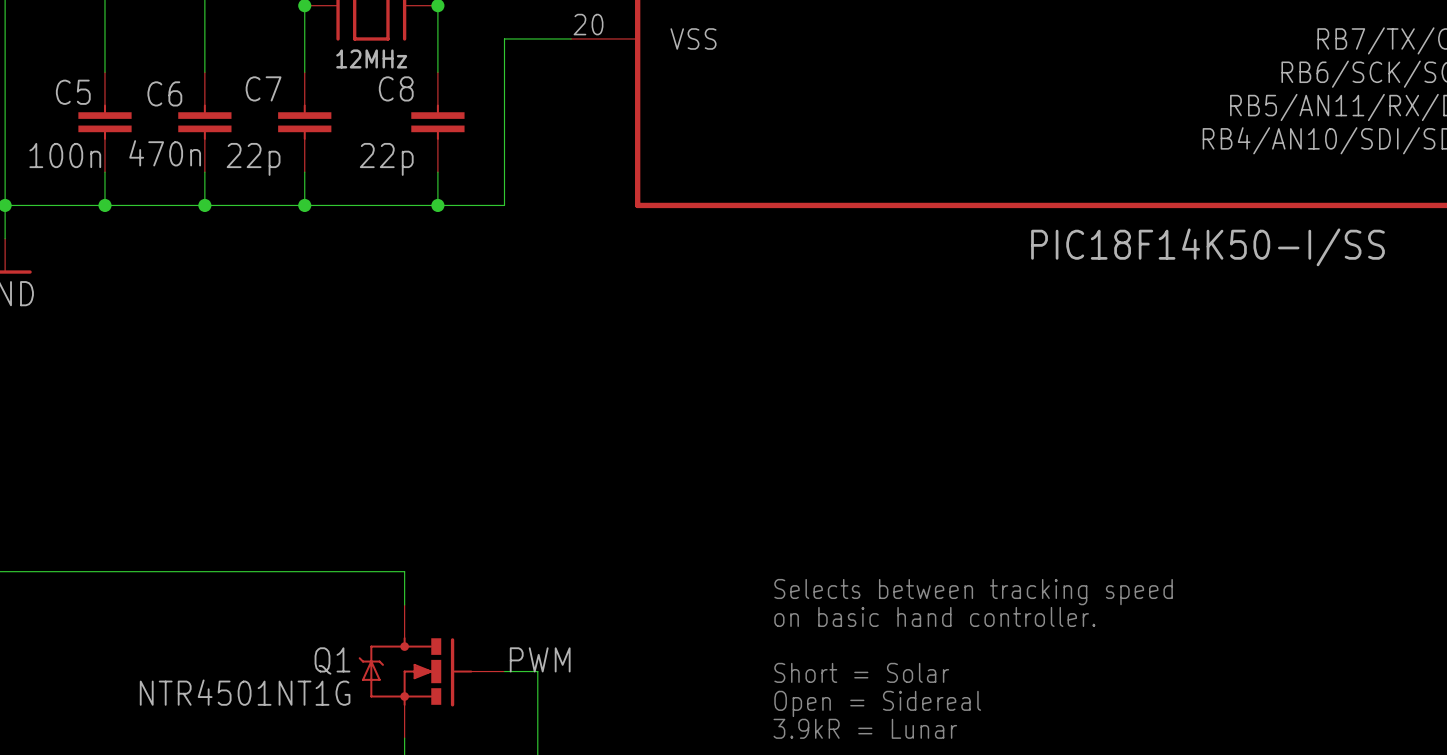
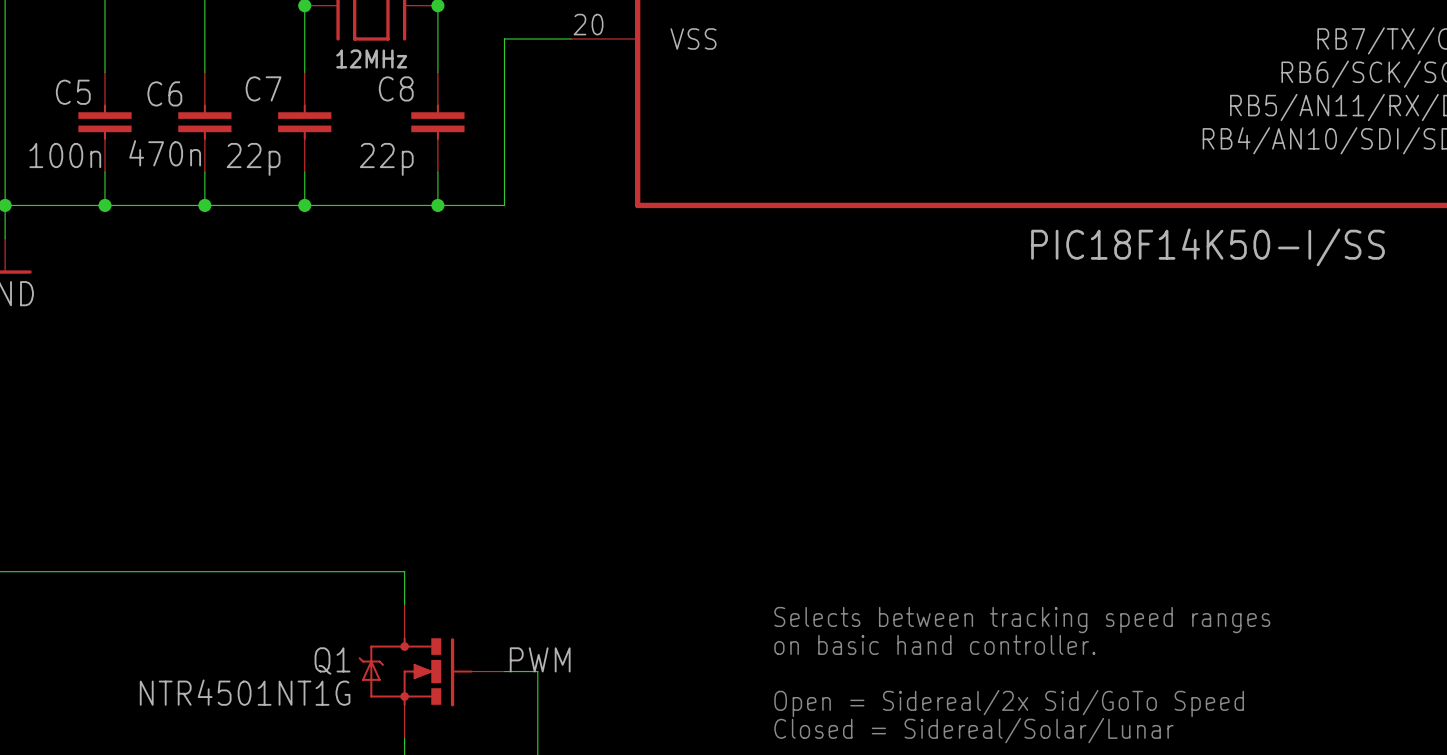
text: Selects between tracking speed (973, 592) -> none
text: on basic hand controller. (934, 616) -> Selects between tracking speed ranges (1022, 620)
text: none -> on basic hand controller. (934, 644)
text: Short = Solar (861, 672) -> none
text: Open = Sidereal (877, 703) -> Open = Sidereal/2x Sid/GoTo Speed (1009, 703)
text: 3.9kR = Lunar (865, 728) -> Closed = Sidereal/Solar/Lunar (973, 730)

